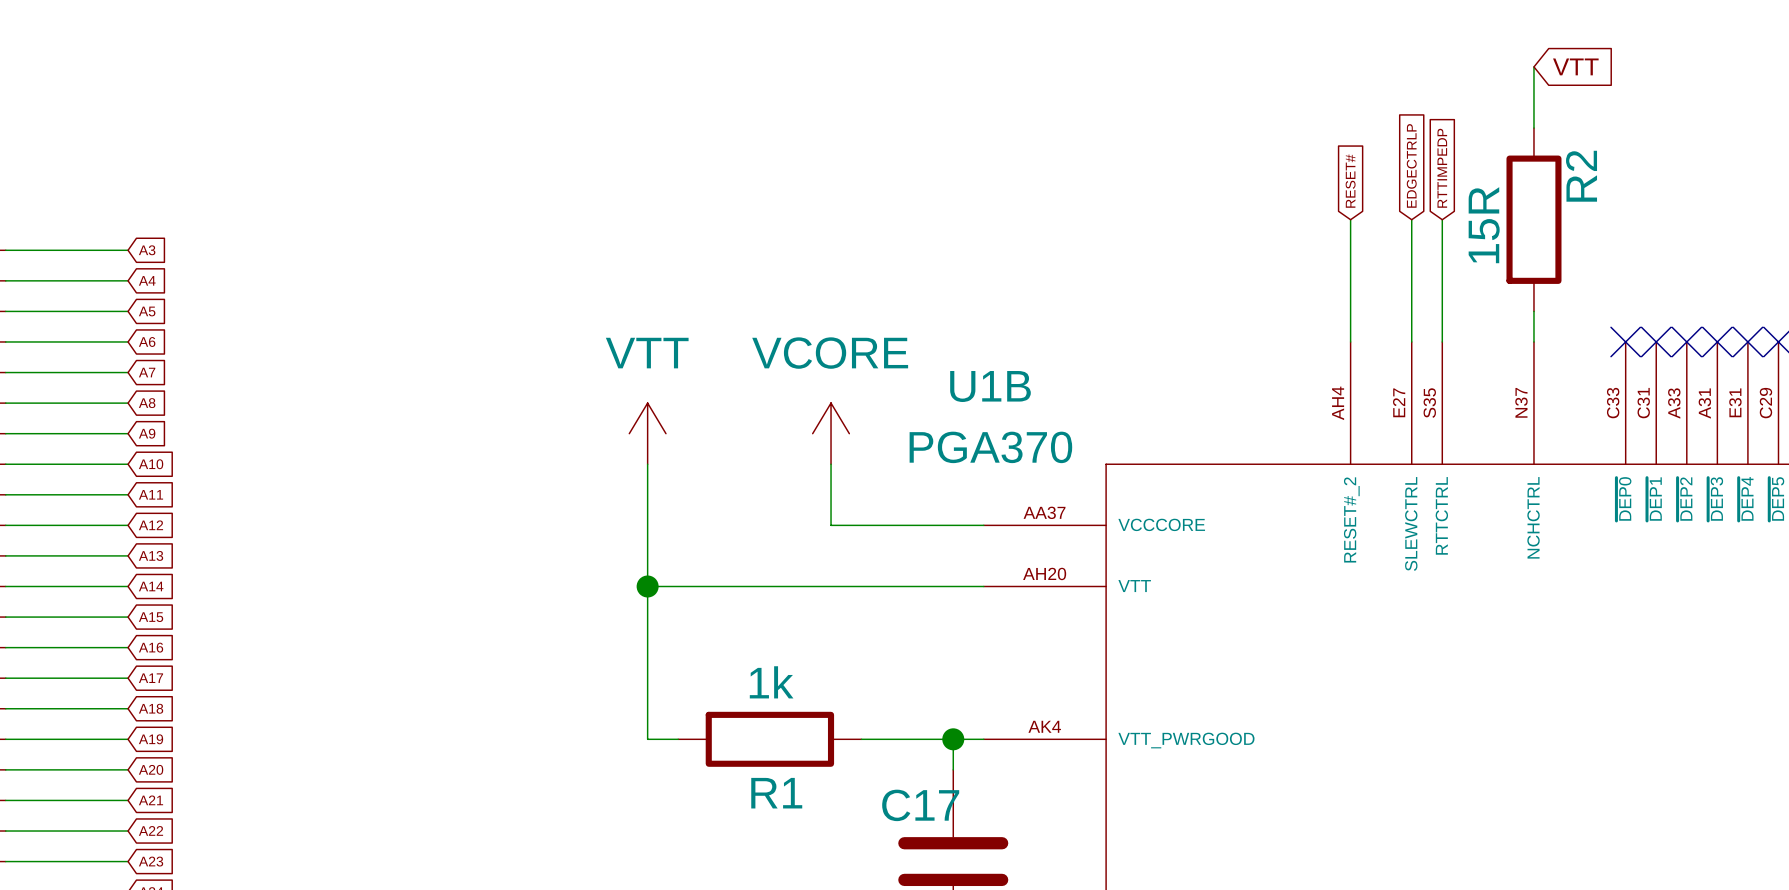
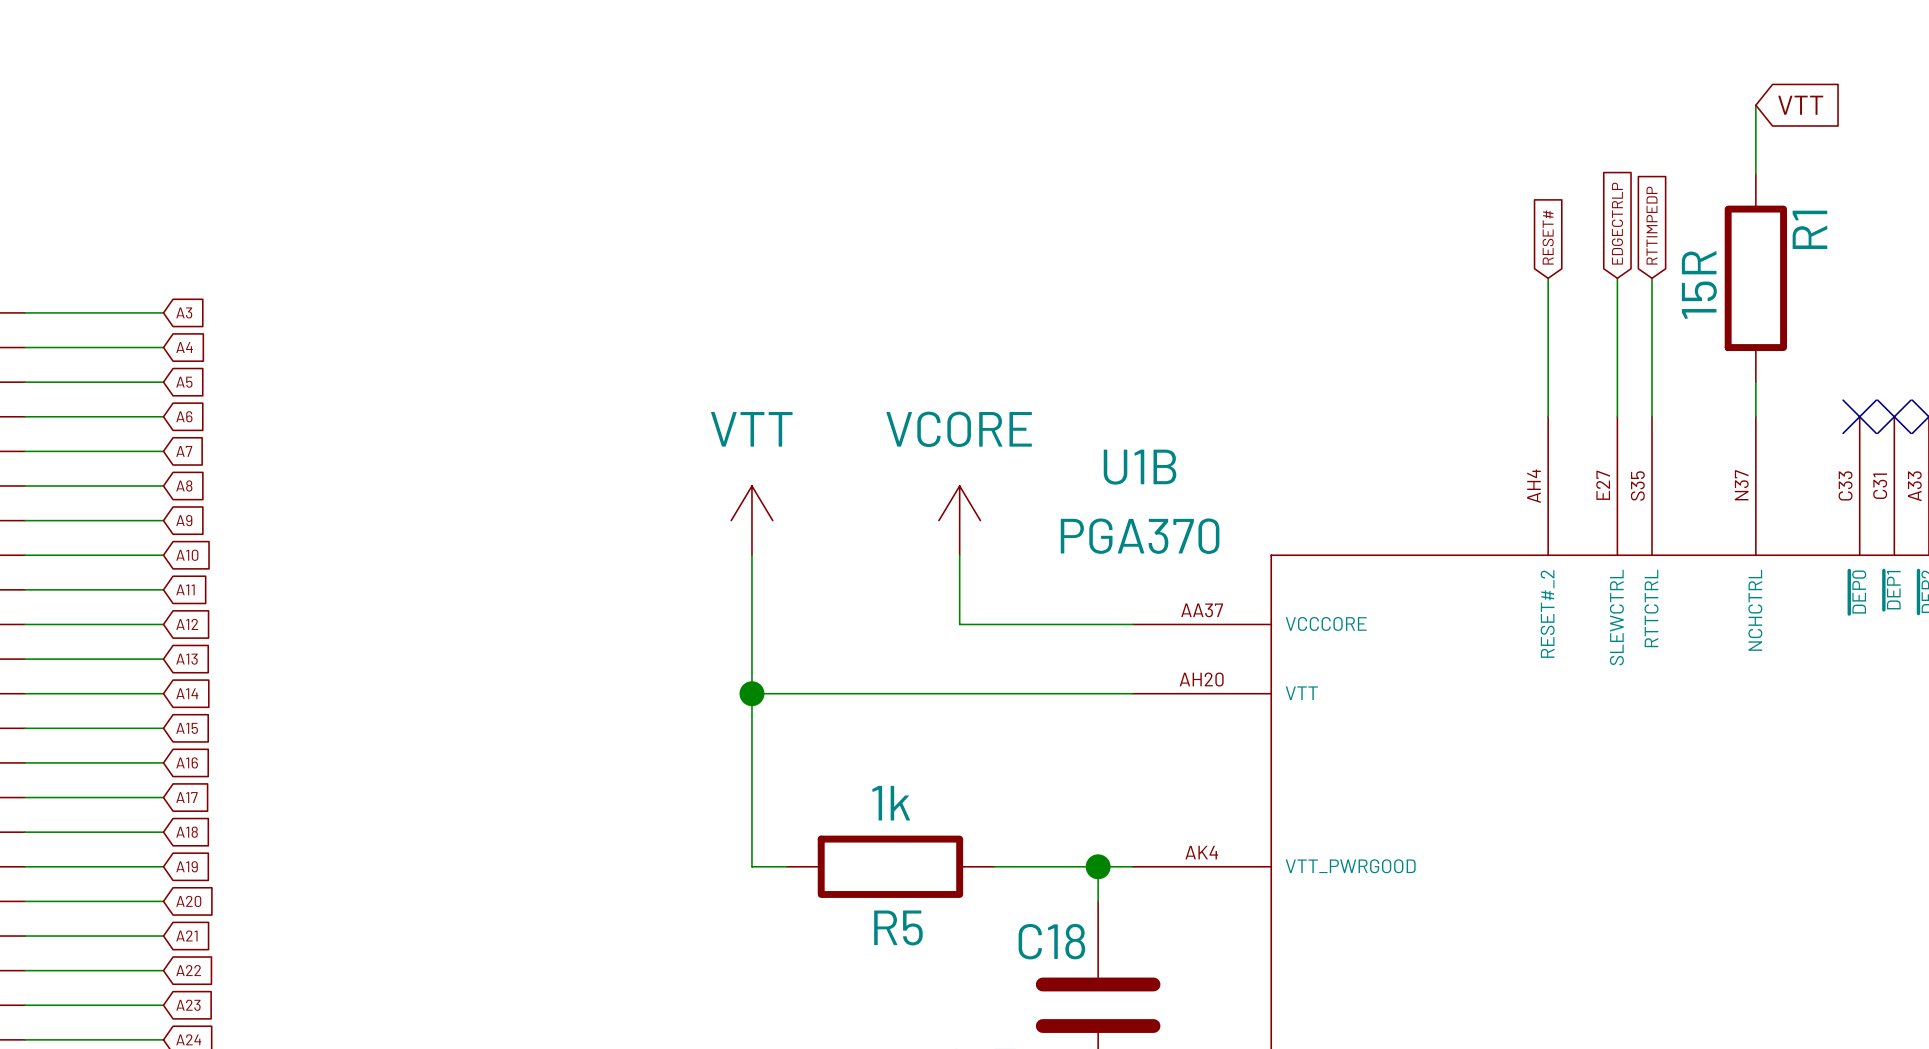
R2 name: R2 (1581, 176) -> R1 (1809, 229)
R1 name: R1 (776, 793) -> R5 (898, 927)
C17 name: C17 (920, 805) -> C18 (1051, 941)

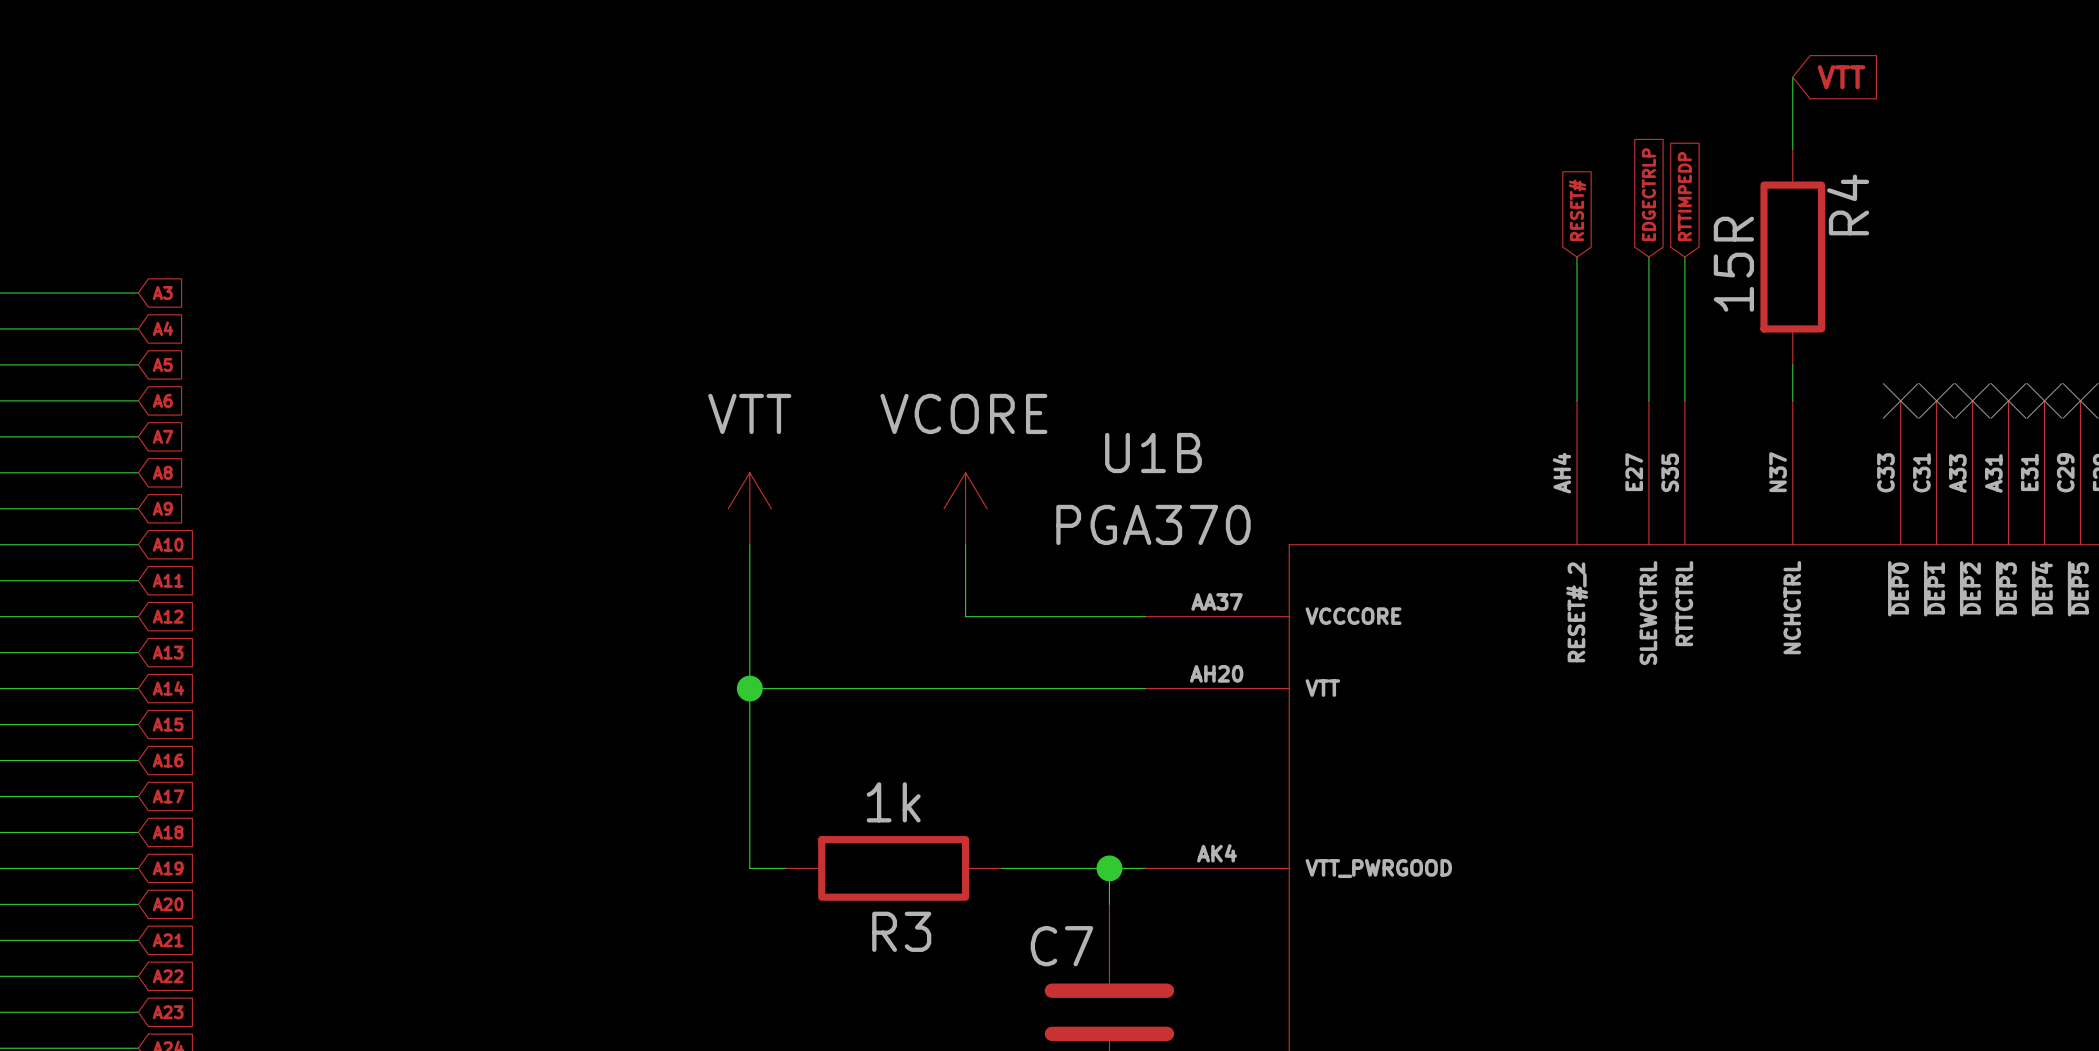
R1 name: R1 (1809, 229) -> R4 (1848, 204)
R5 name: R5 (898, 927) -> R3 (901, 931)
C18 name: C18 (1051, 941) -> C7 (1061, 946)

